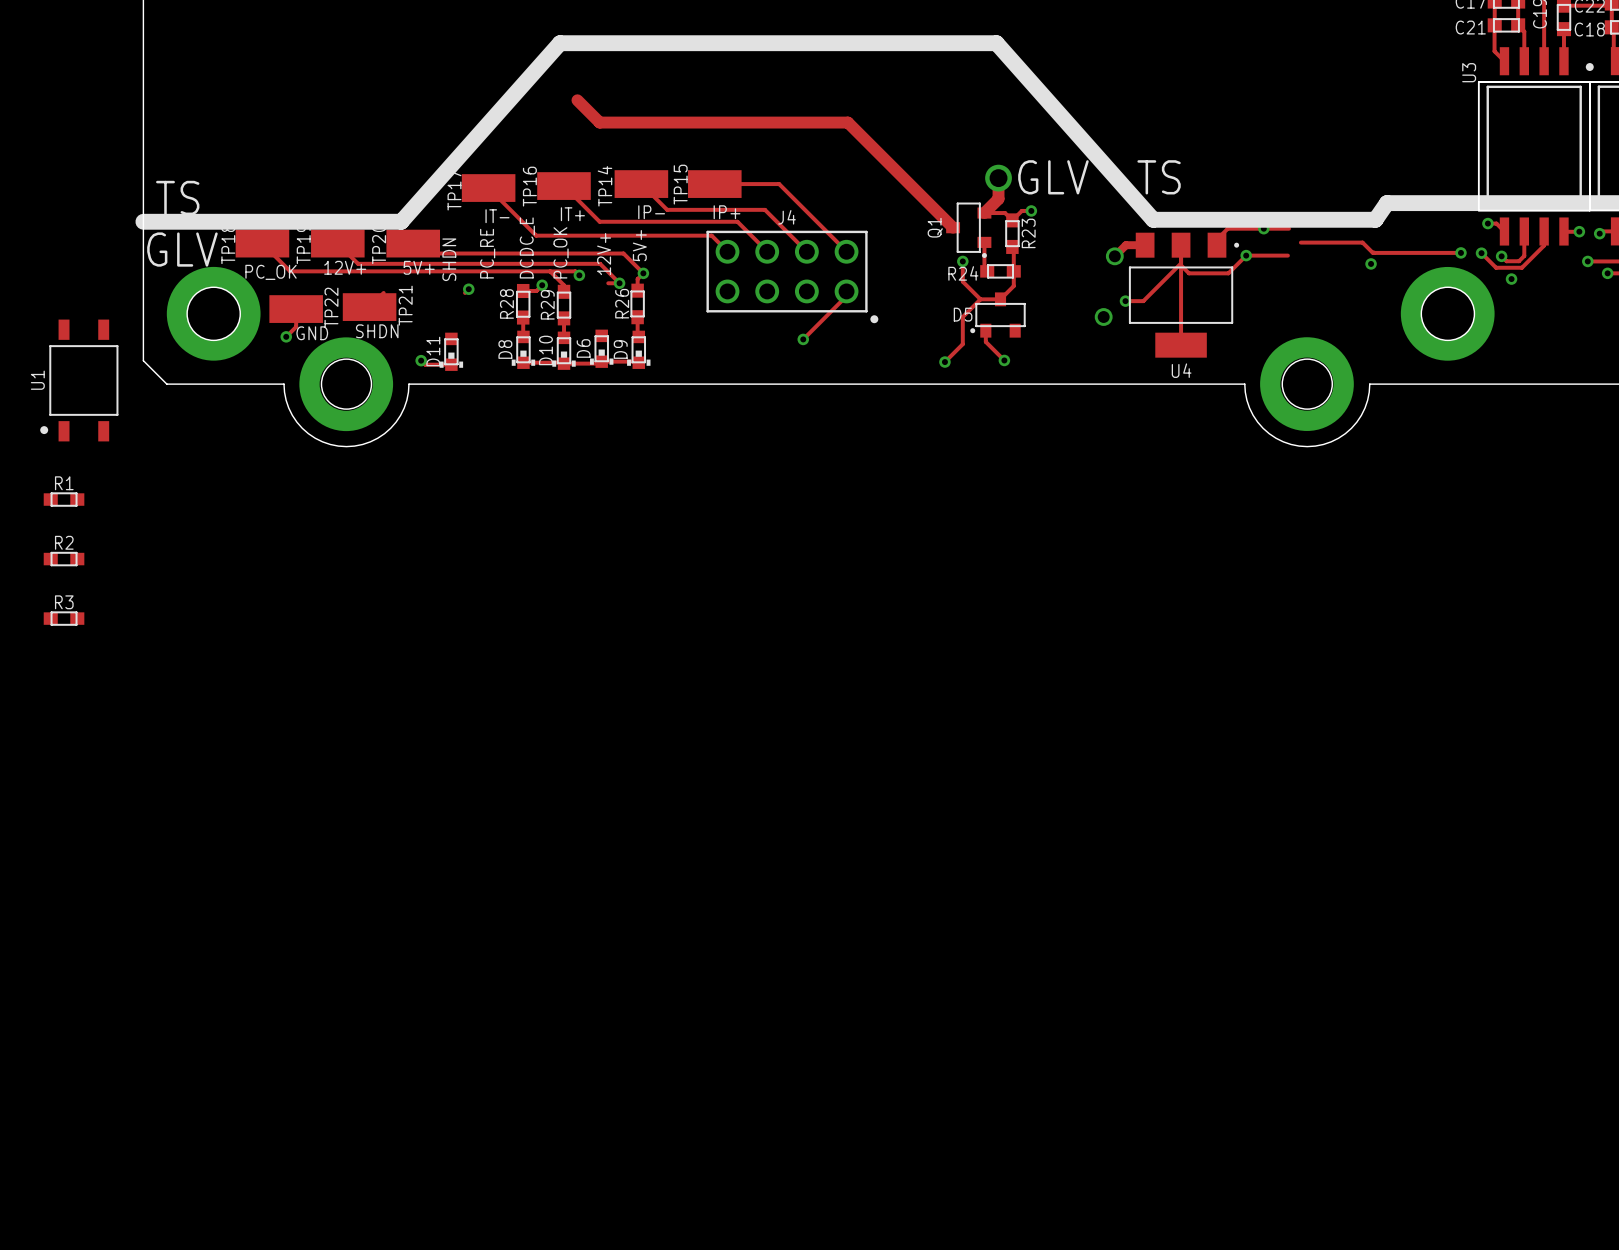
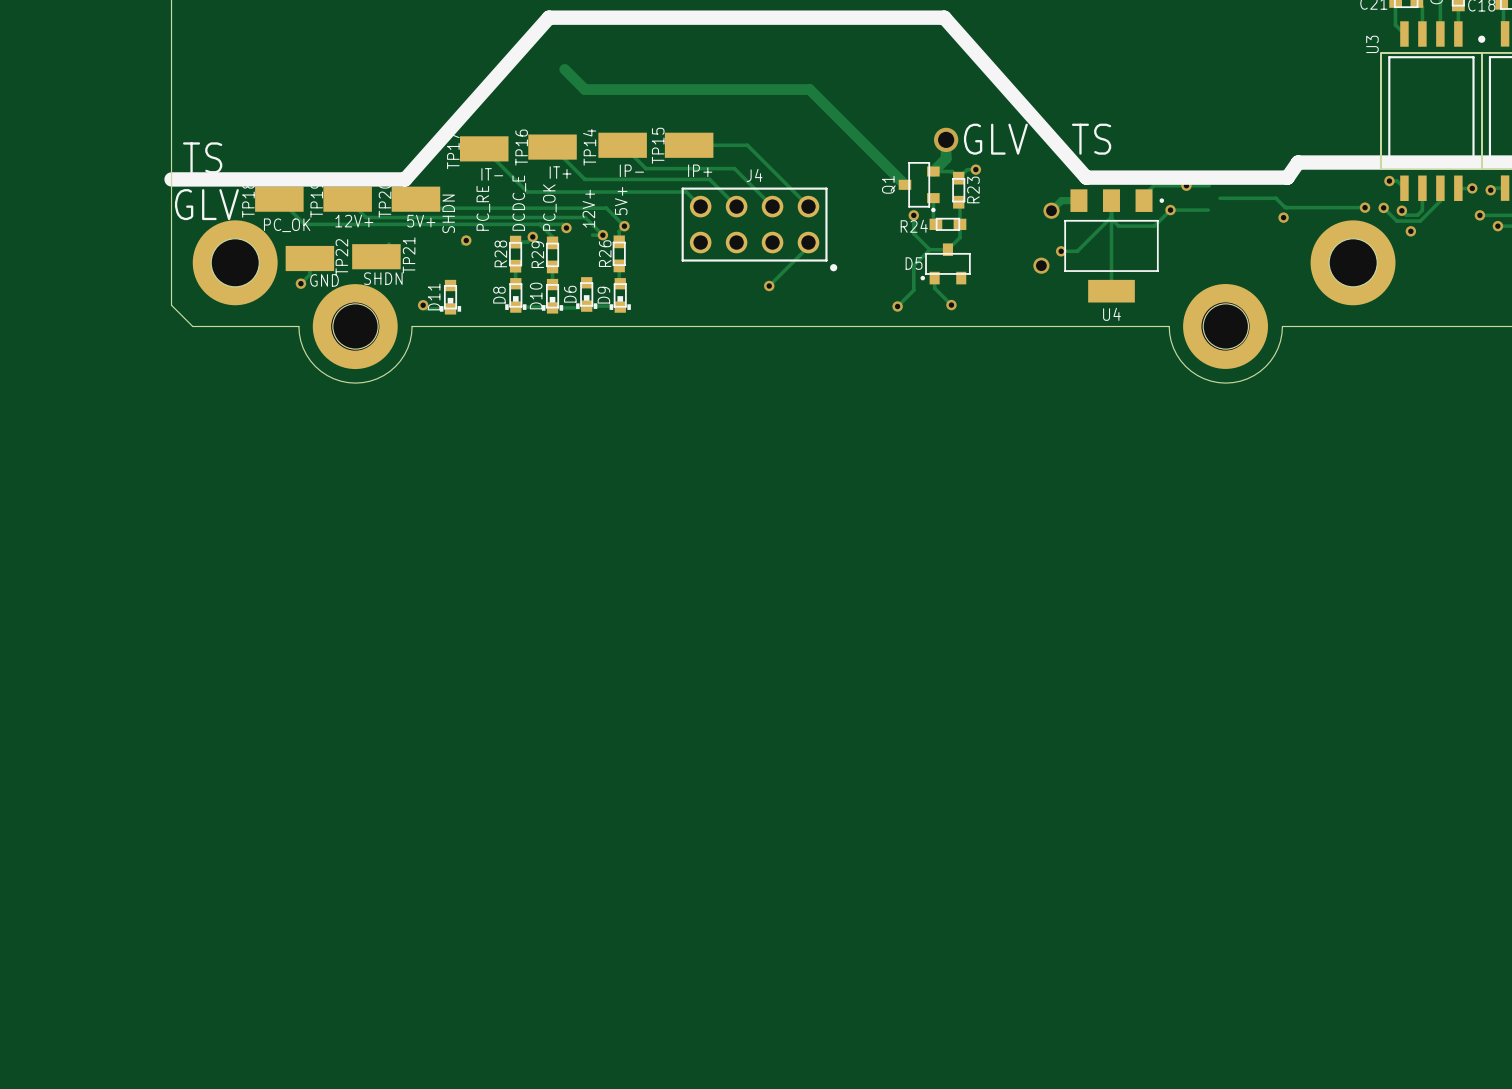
U1: (79, 380) -> none
R1: (64, 499) -> none
R2: (64, 559) -> none
R3: (64, 618) -> none

